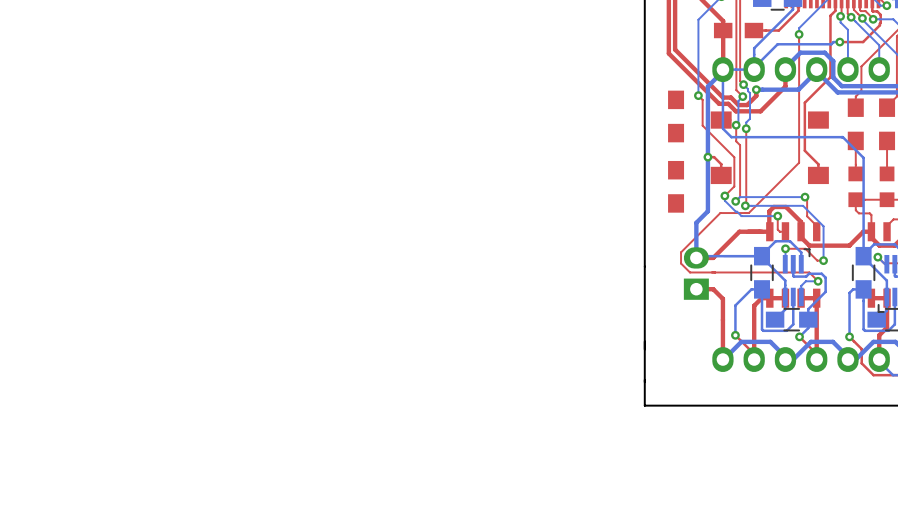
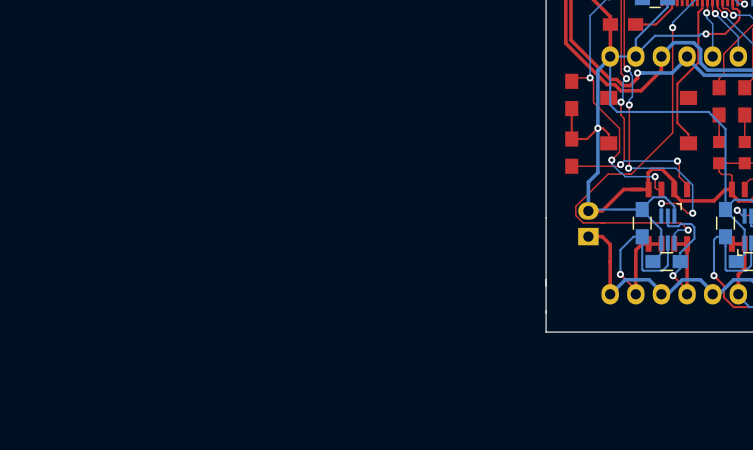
top track: none -> (590, 77) (575, 77) (571, 81)
top track: none -> (571, 108) (571, 139) (587, 139) (597, 128)
top track: none -> (620, 164) (618, 166) (571, 166)

